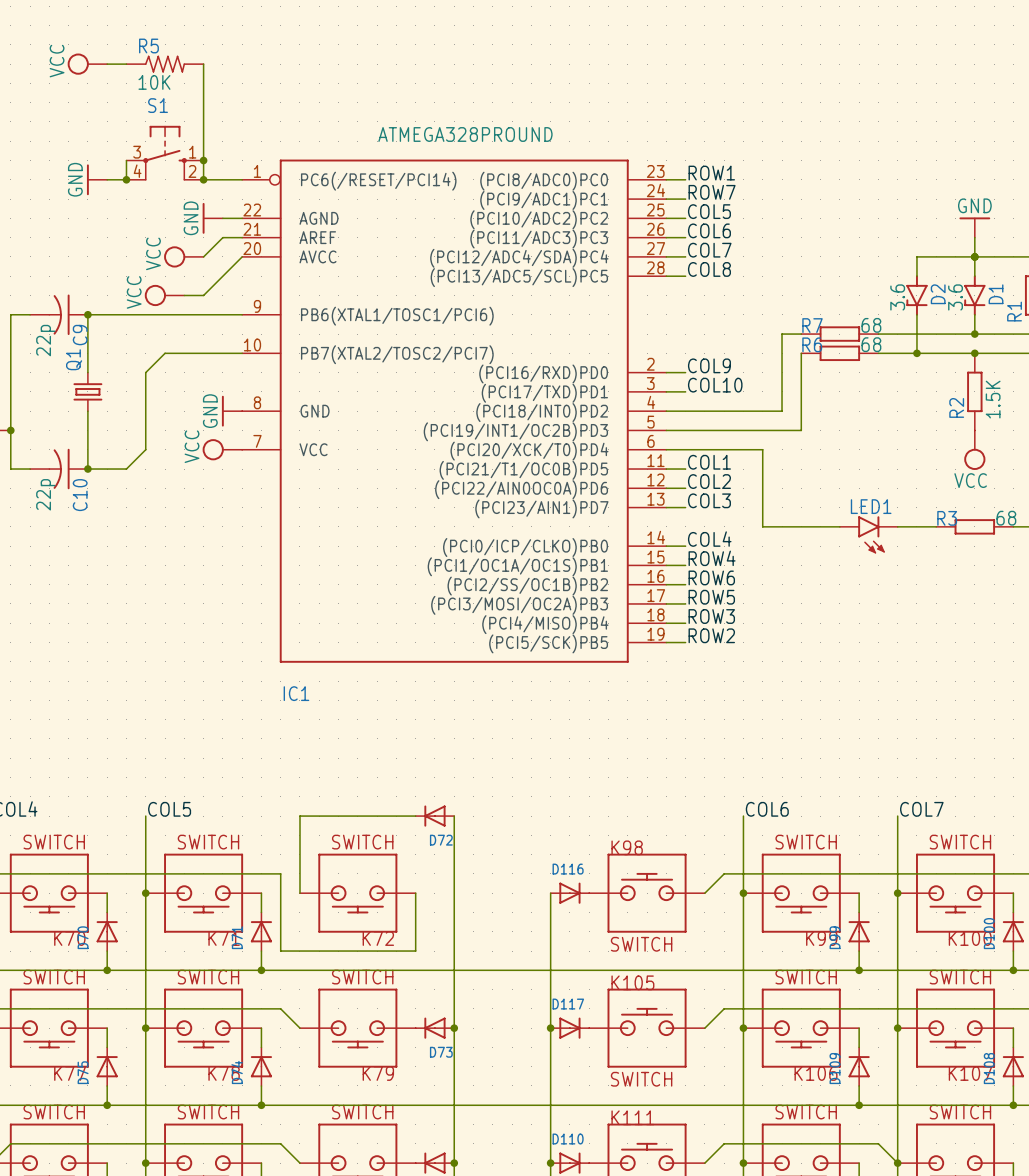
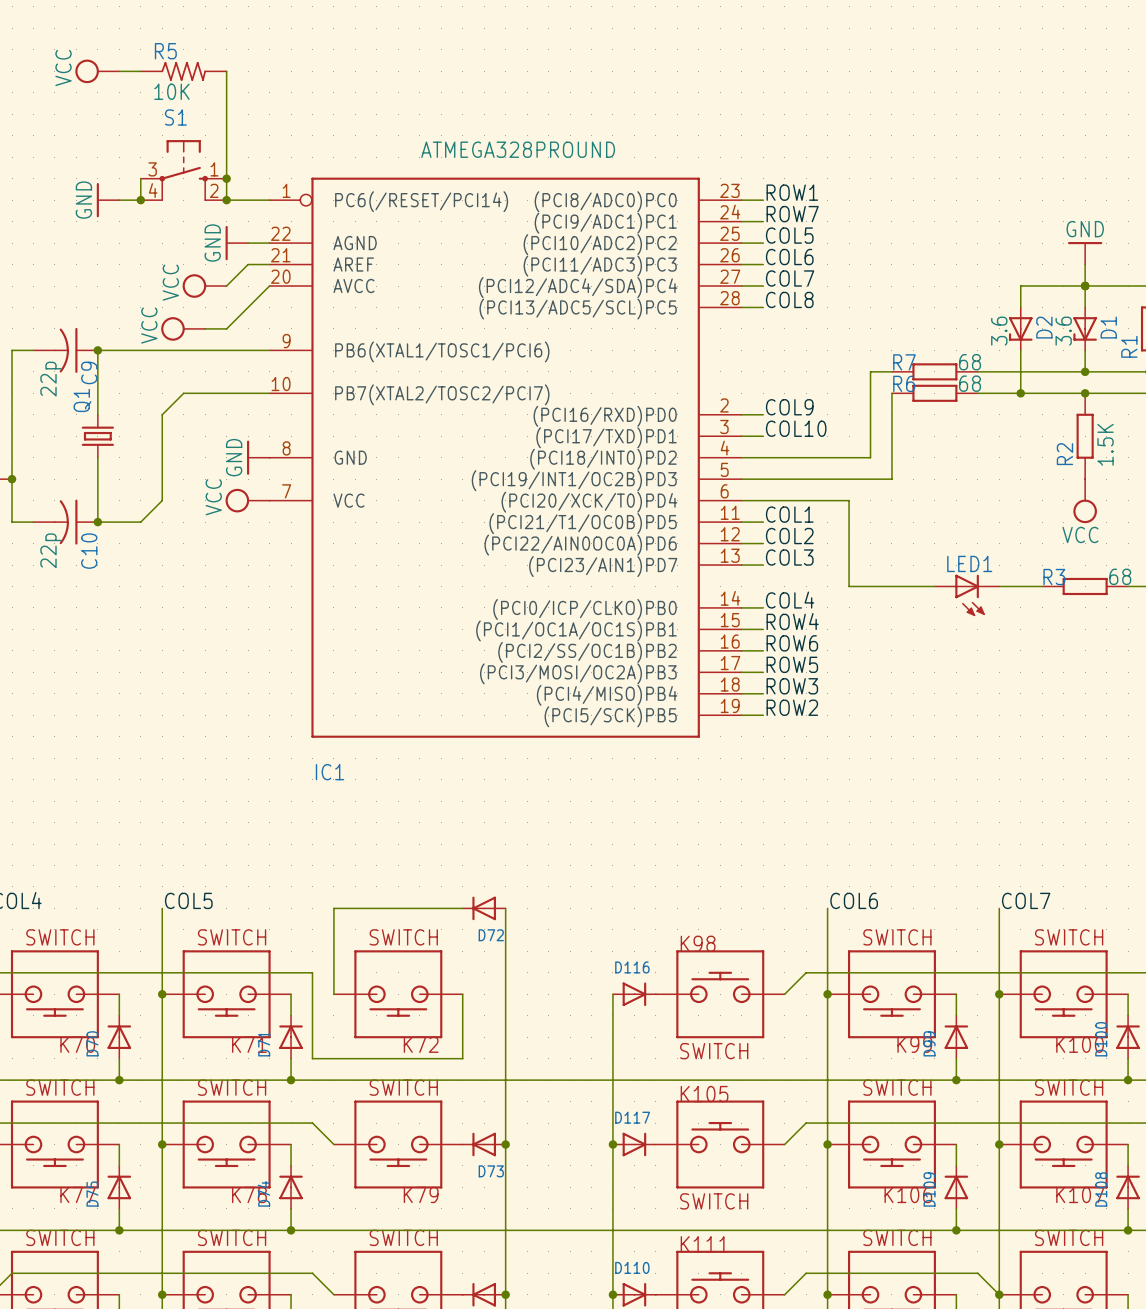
D2 symbol: [906, 275, 928, 316] -> [1008, 307, 1033, 351]
D1 symbol: [964, 275, 986, 316] -> [1073, 307, 1097, 351]
LED1 symbol: [839, 516, 898, 554] -> [934, 574, 1000, 617]

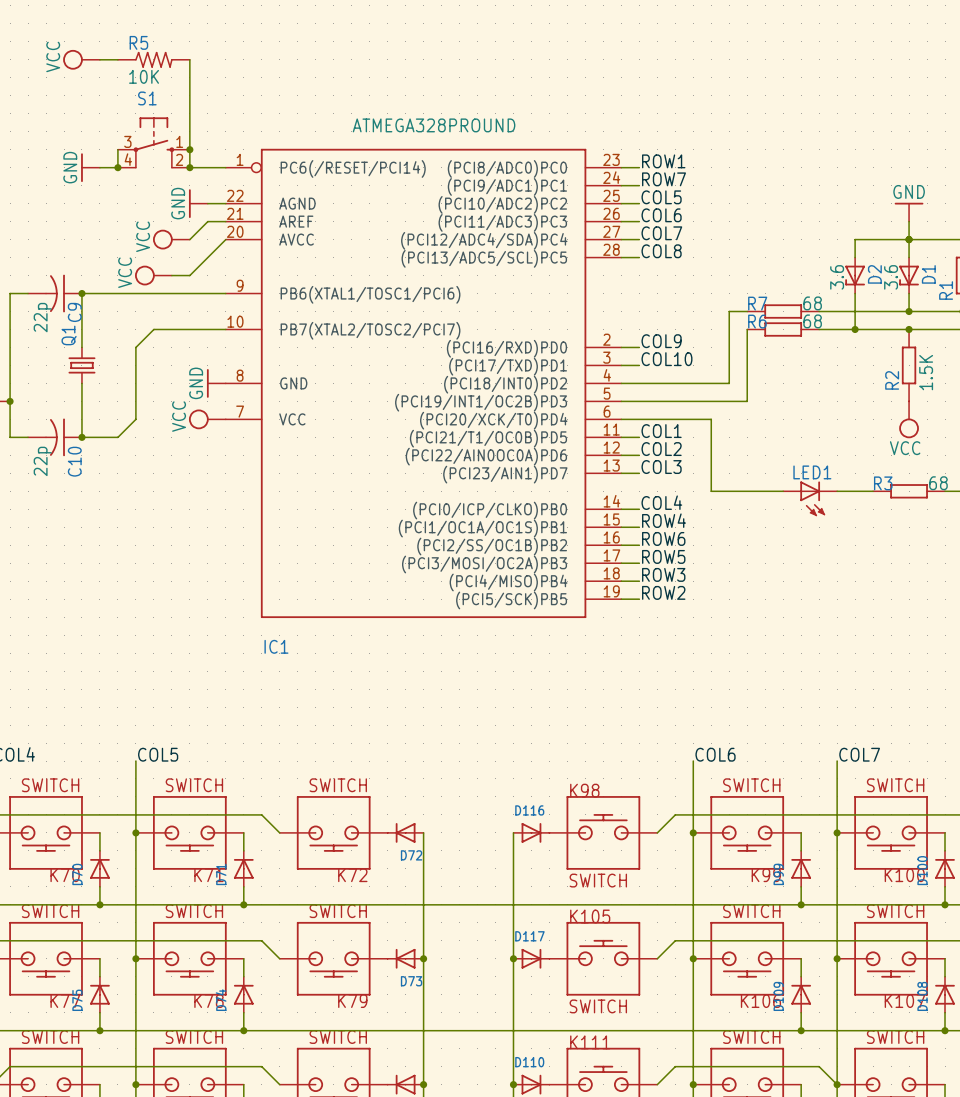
wire: (462, 908) (333, 908) (333, 994) -> none
D72 position: (484, 908) -> (405, 832)
wire: (505, 908) (505, 994) -> none
wire: (312, 972) (312, 1058) (462, 1058) (462, 994) -> (261, 814) (279, 832)

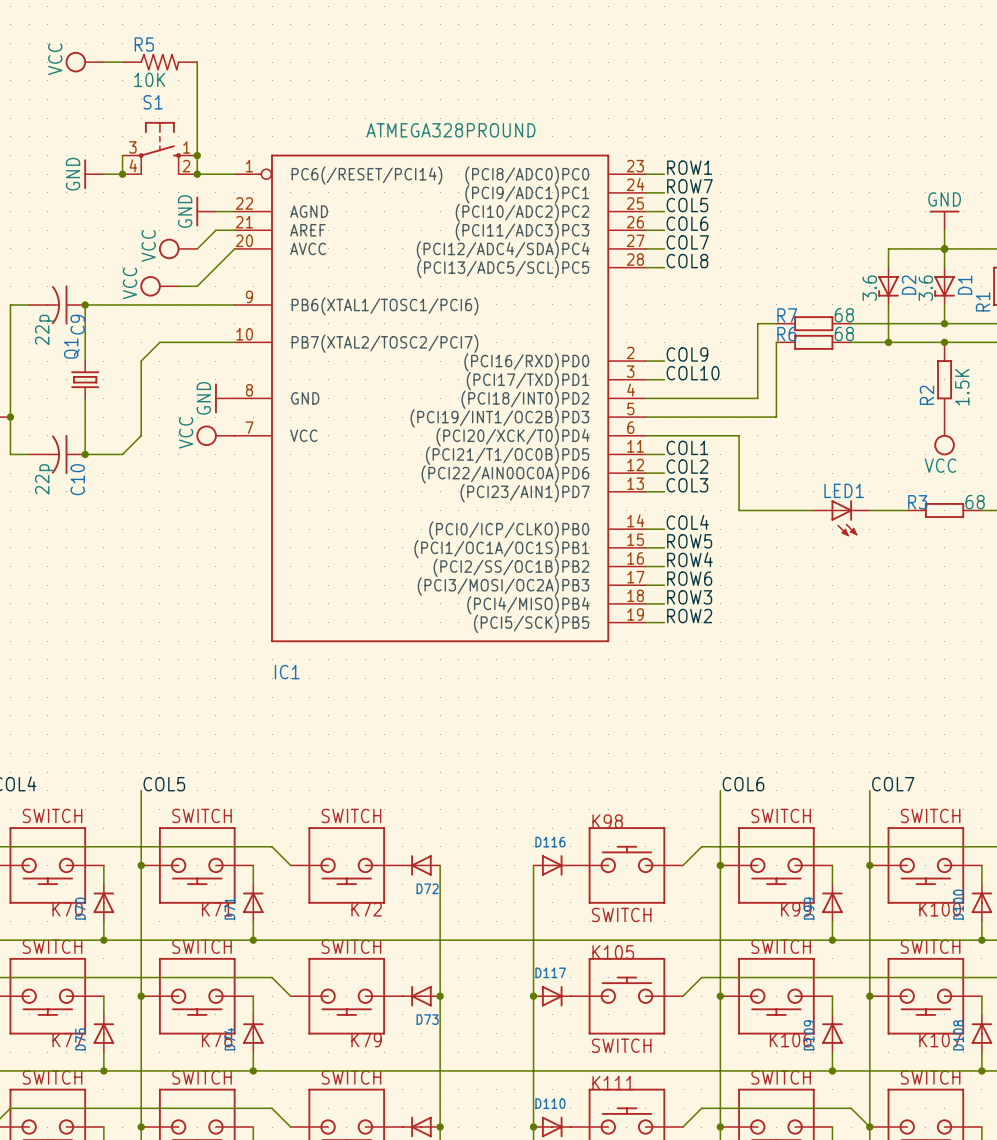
label: ROW4 (664, 520) -> ROW5 (689, 541)
label: ROW6 (663, 538) -> ROW4 (689, 559)
label: ROW5 (663, 556) -> ROW6 (689, 578)

